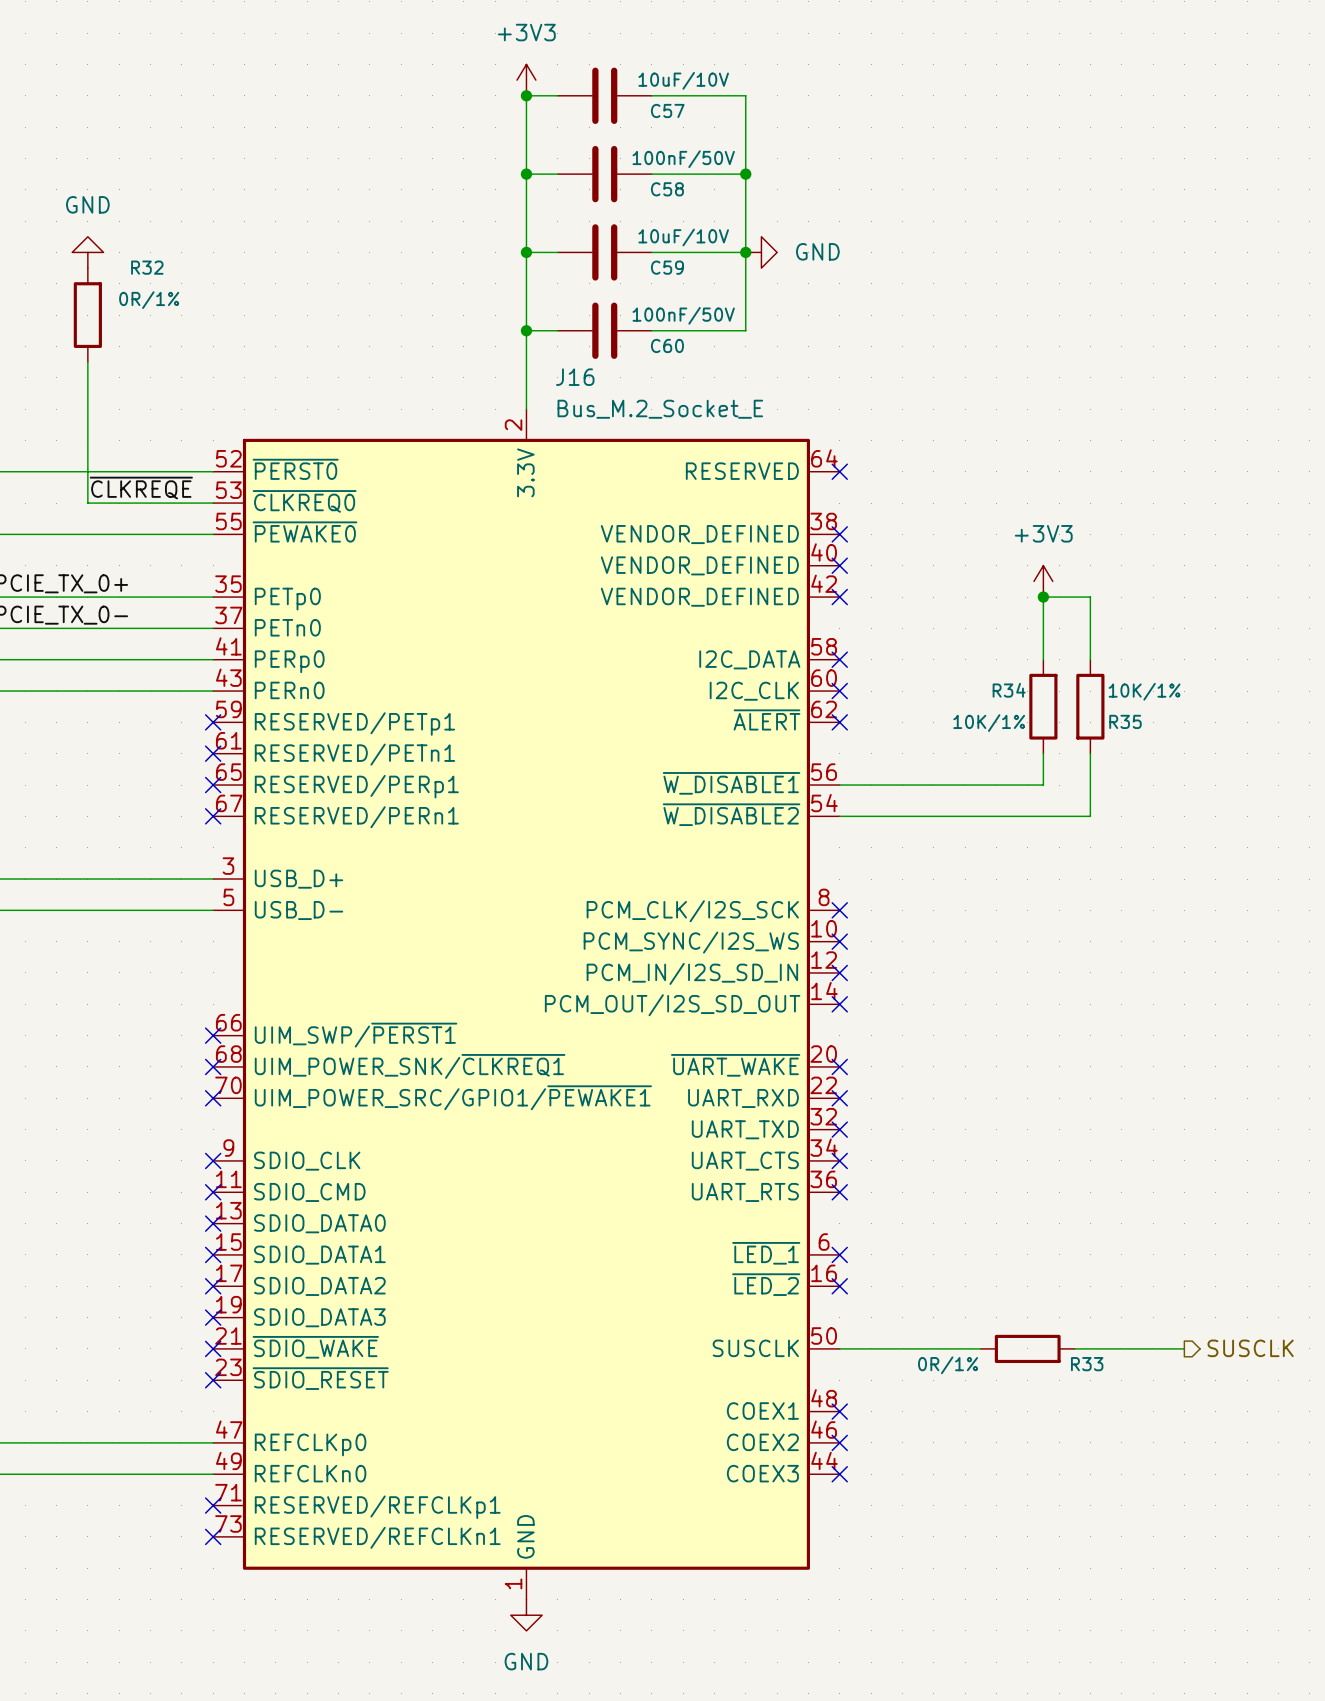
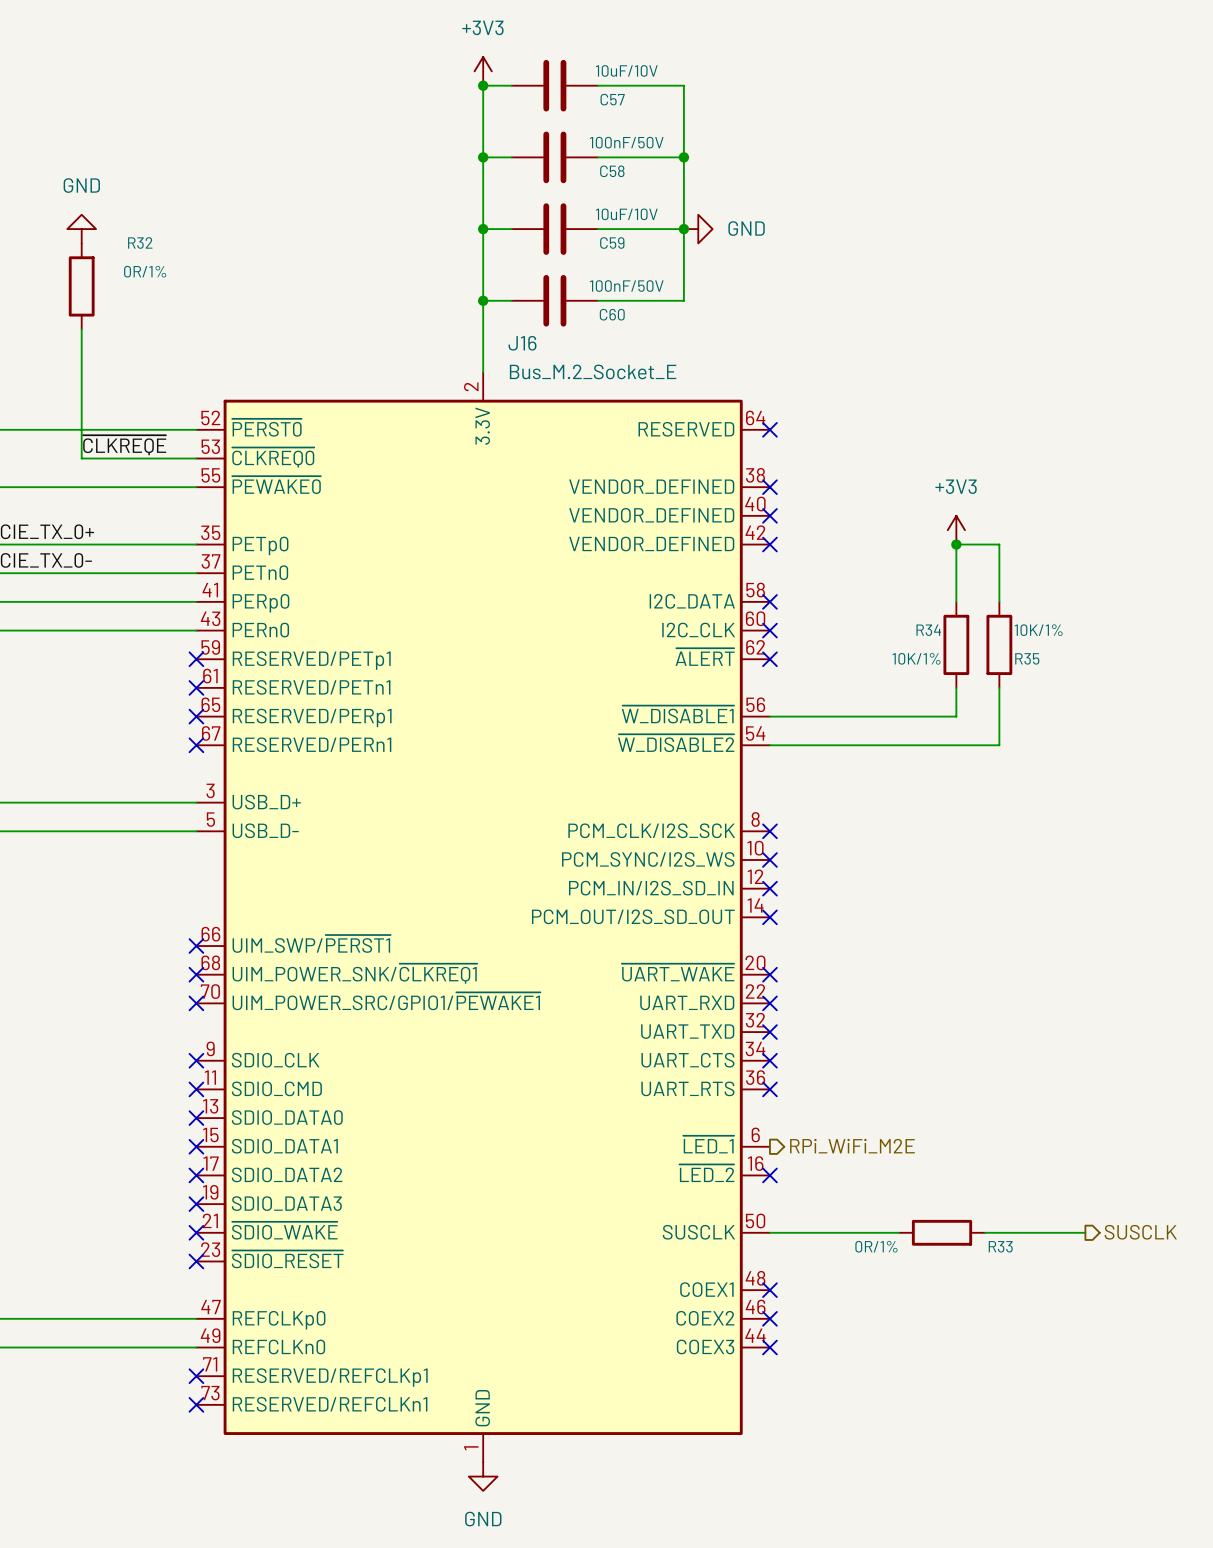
no-connect mark: (839, 1254) -> none
hierarchical label: none -> RPi_WiFi_M2E (852, 1146)

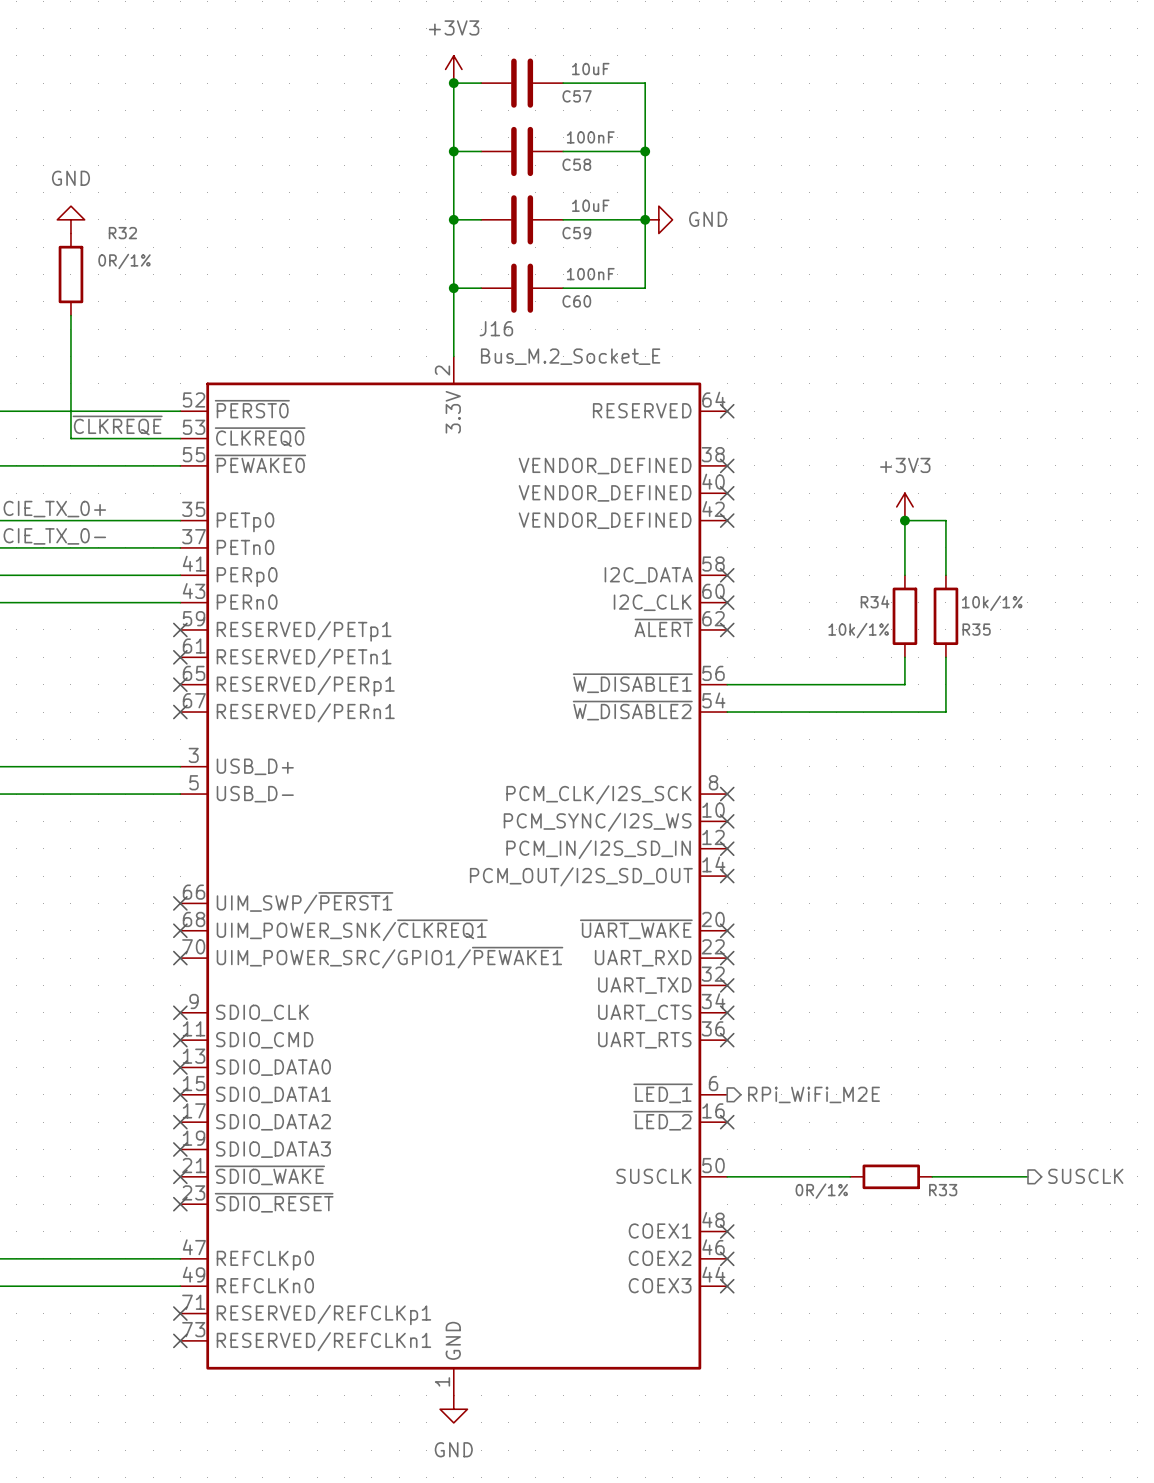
C57 value: 10uF/10V (626, 70) -> 10uF (590, 69)
C58 value: 100nF/50V (626, 142) -> 100nF (590, 137)
C59 value: 10uF/10V (626, 214) -> 10uF (590, 205)
C60 value: 100nF/50V (626, 286) -> 100nF (590, 274)
R35 value: 10K/1% (1038, 630) -> 10k/1% (992, 603)
R34 value: 10K/1% (916, 658) -> 10k/1% (858, 630)

